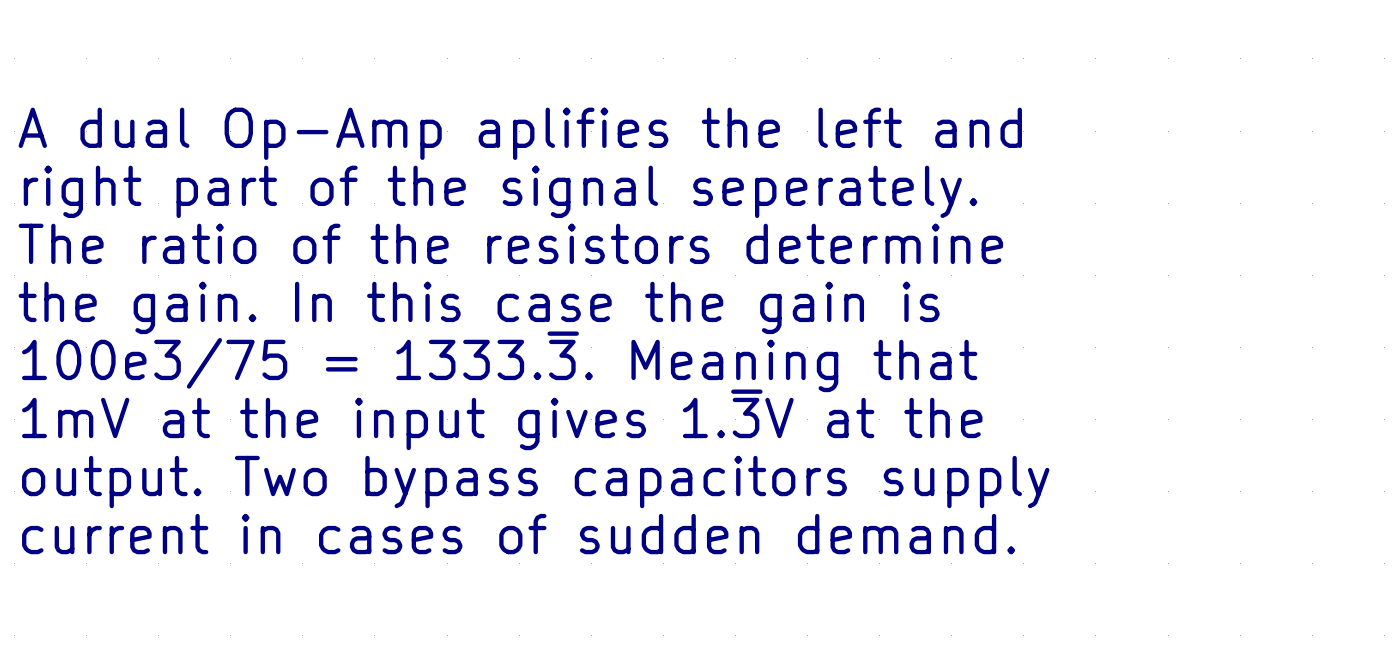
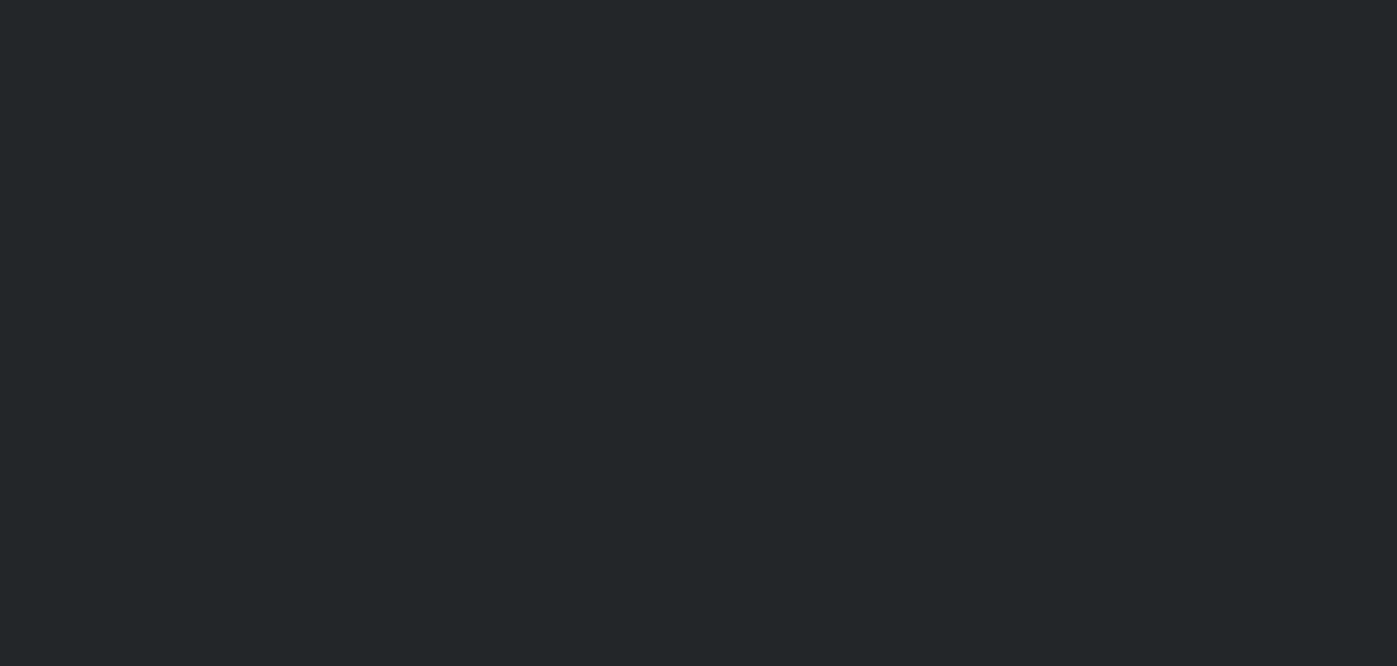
text: A dual Op-Amp aplifies the left and (520, 133) -> none
text: right part of the signal seperately. (500, 191) -> none
text: The ratio of the resistors determine (510, 243) -> none
text: the gain. In this case the gain is (479, 307) -> none
text: 100e3/75 = 1333.~{3}. Meaning that (499, 361) -> none
text: 1mV at the input gives 1.~{3}V at the (502, 419) -> none
text: output. Two bypass capacitors supply (535, 482) -> none
text: current in cases of sudden demand. (518, 534) -> none

